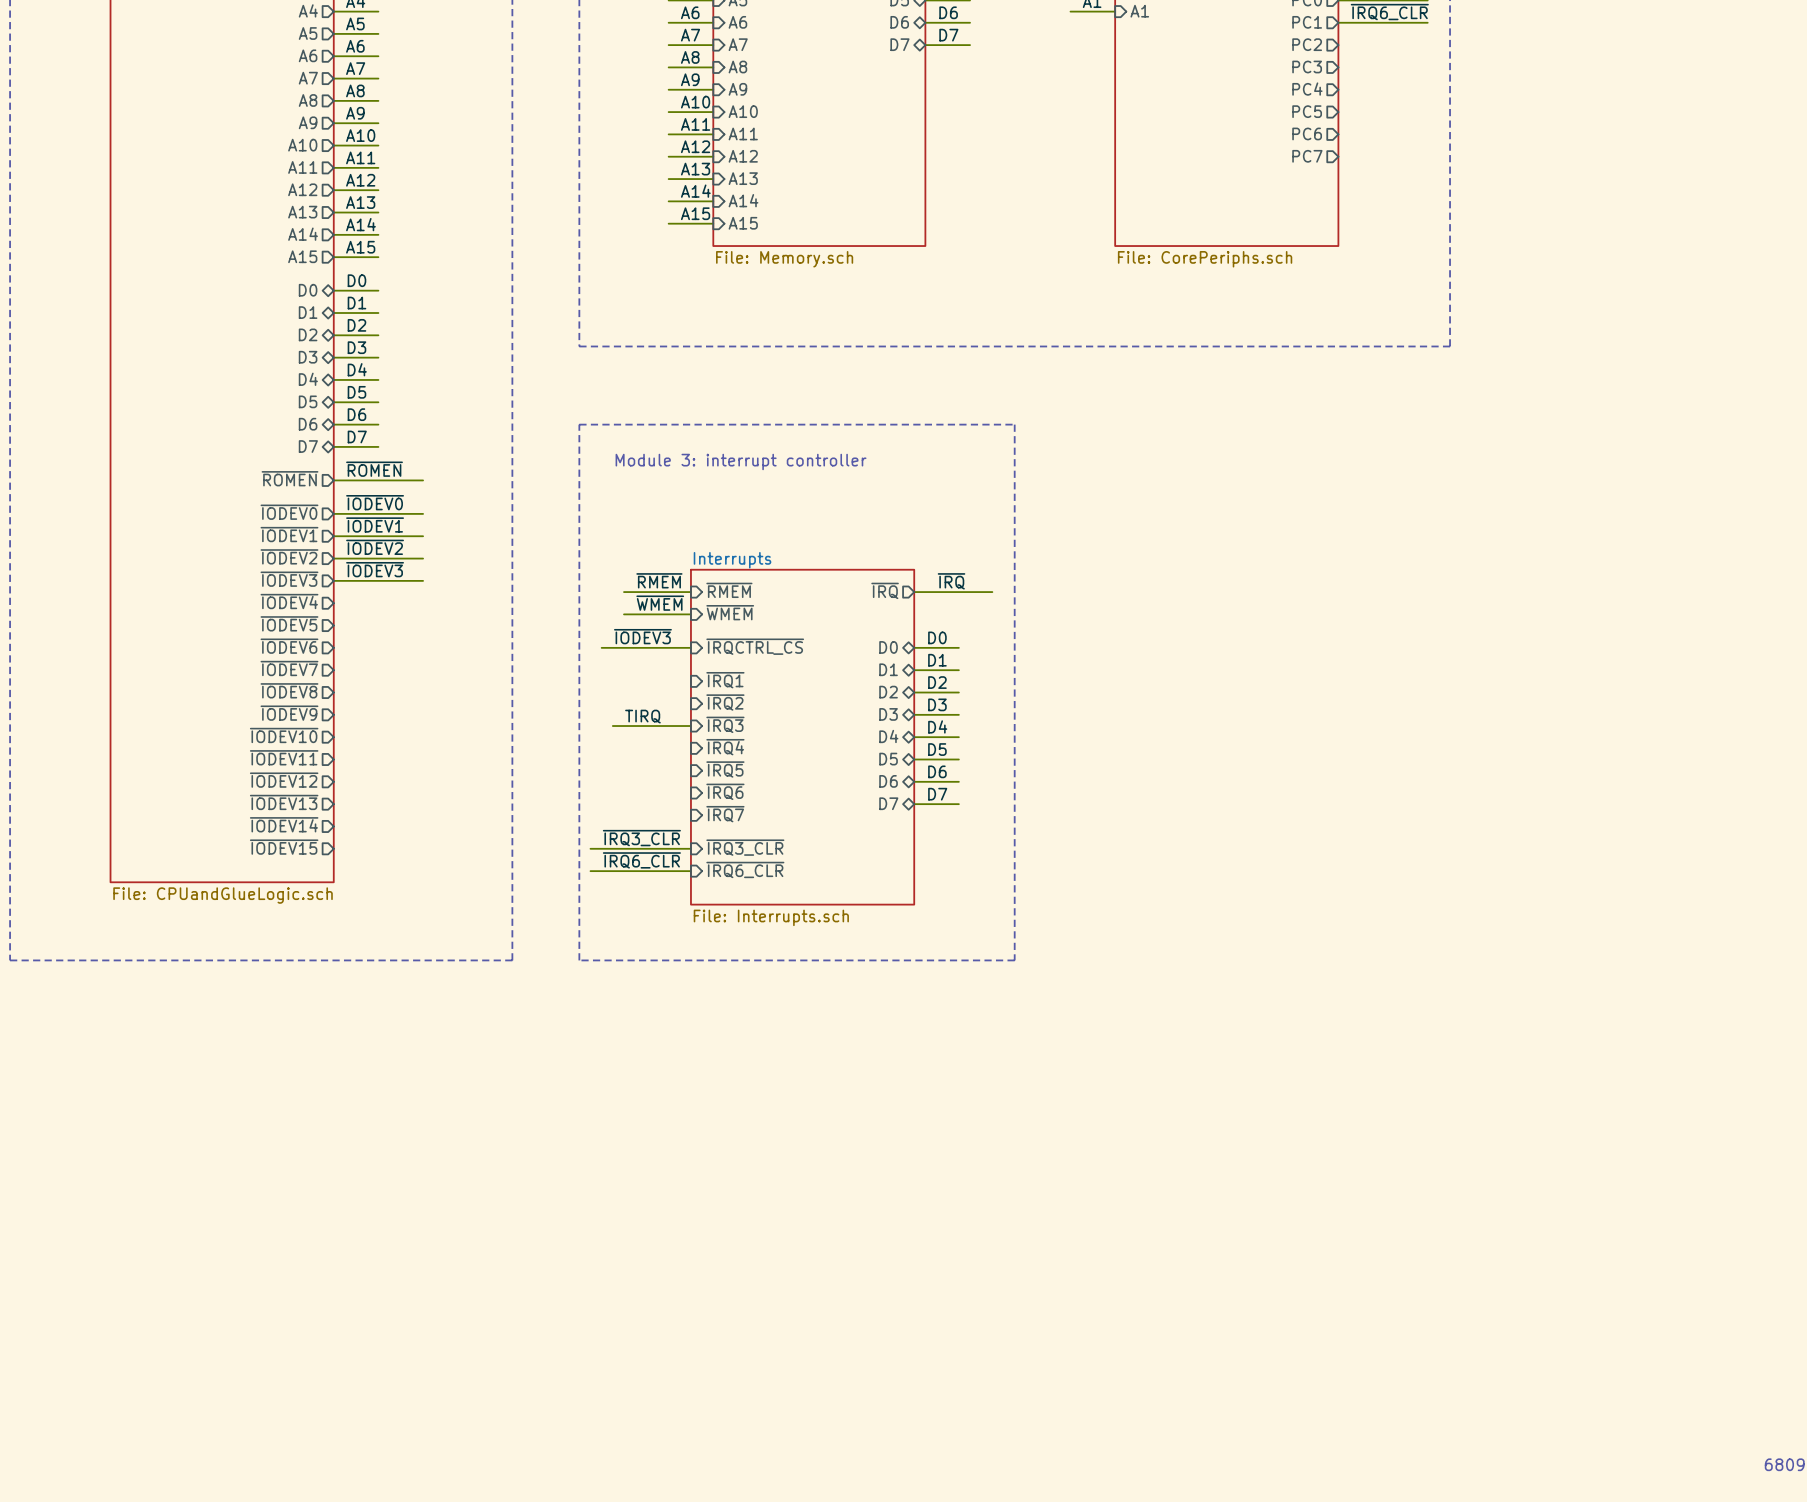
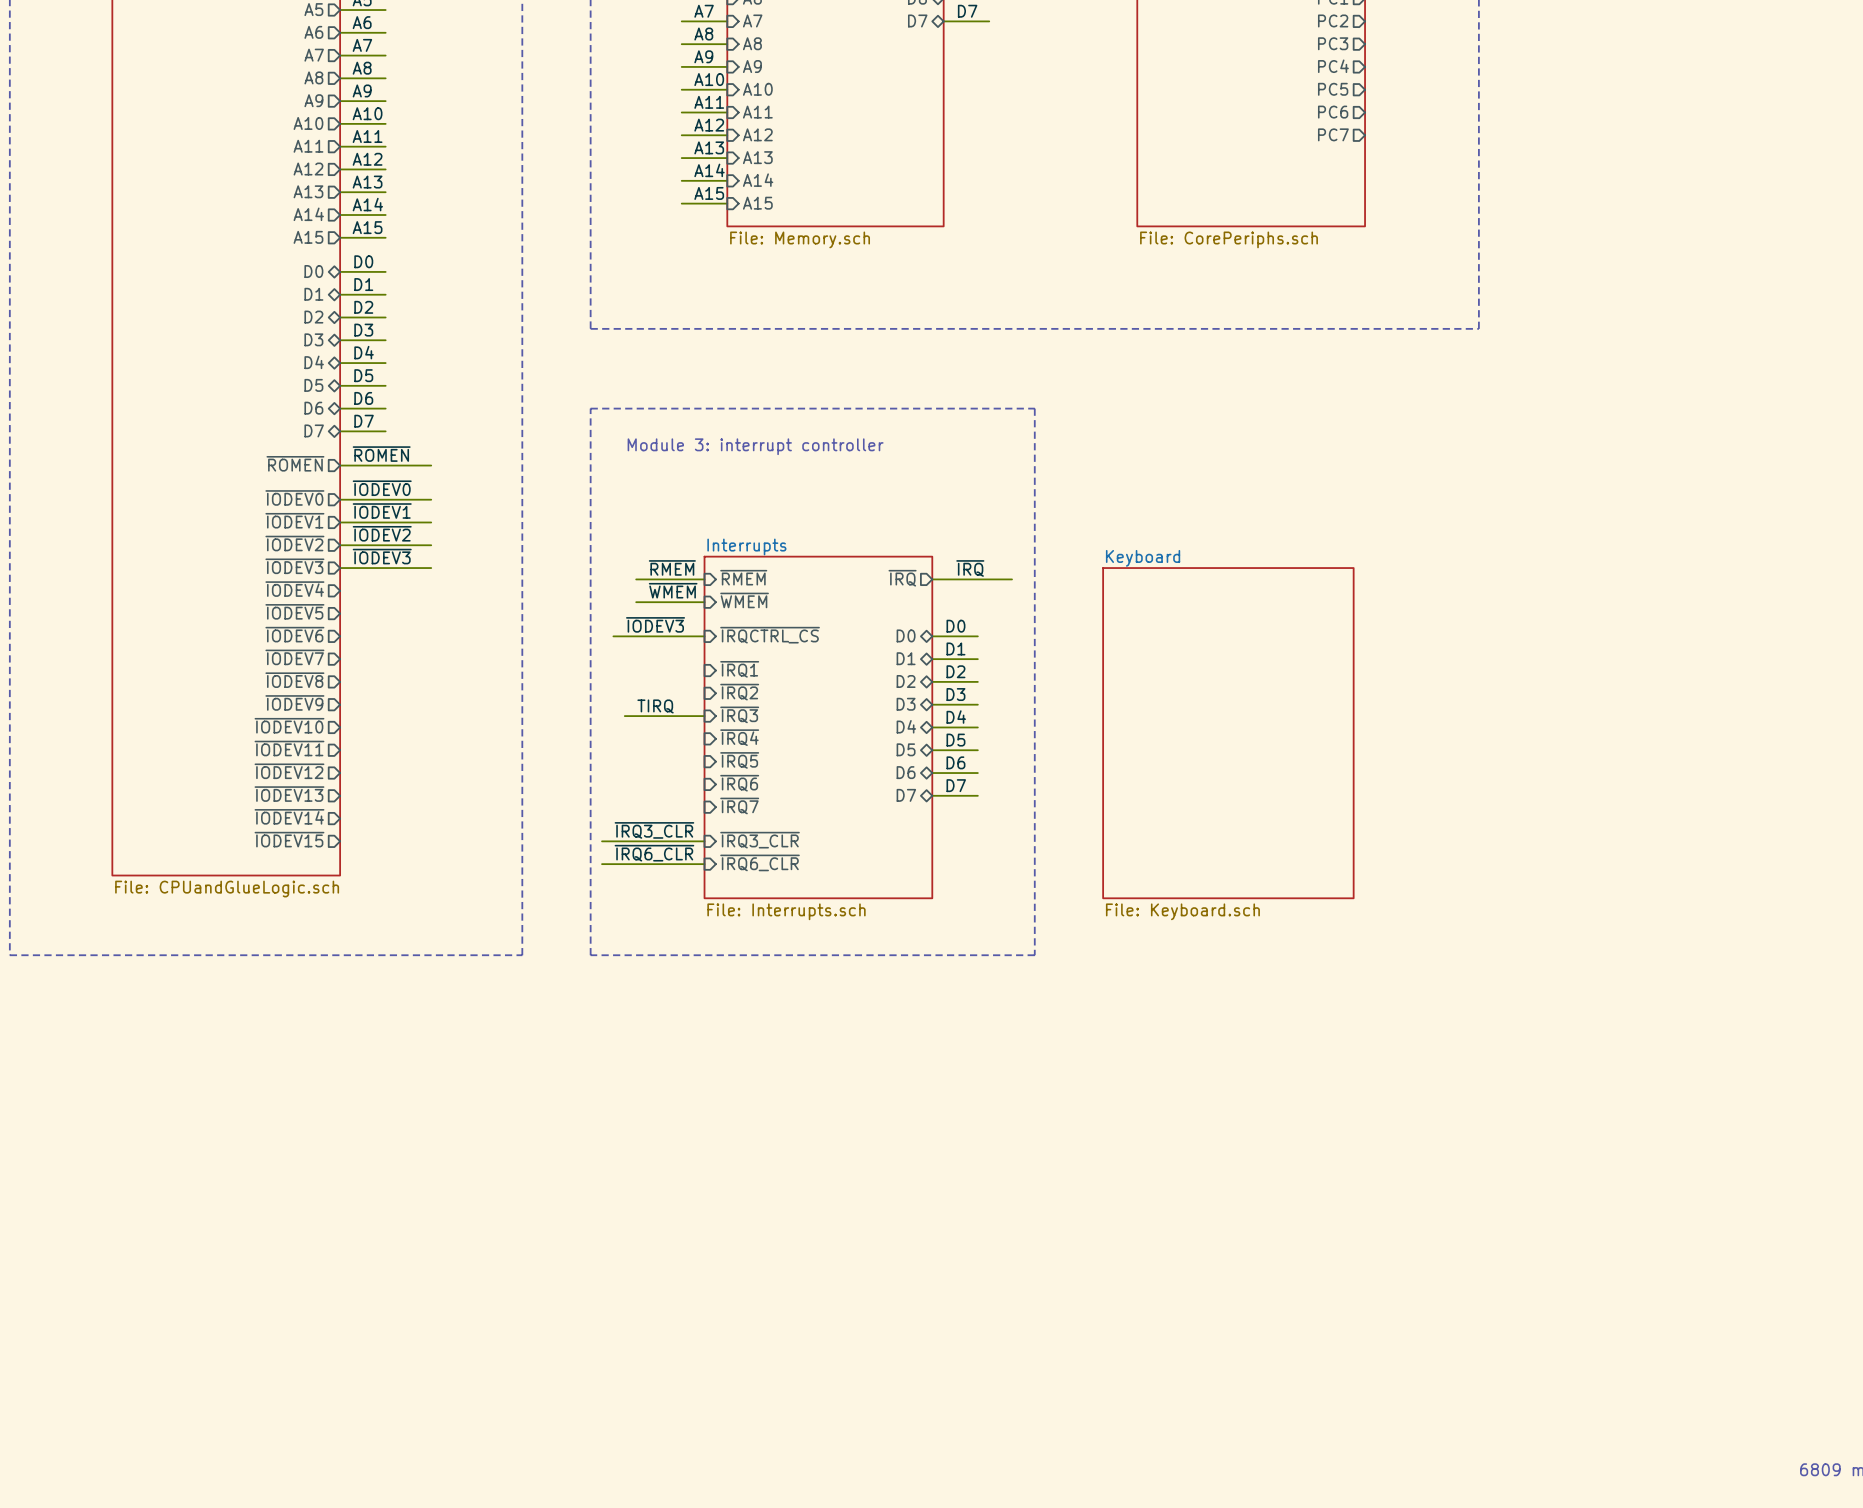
sheet Keyboard: none -> File: Keyboard.sch (1228, 733)

